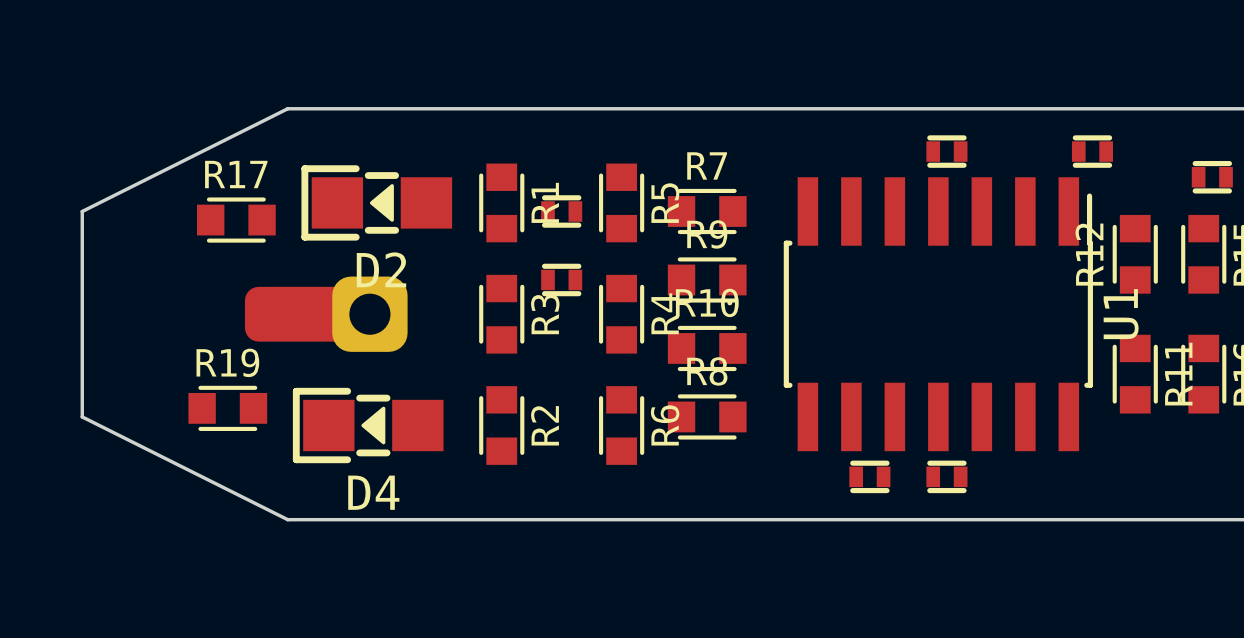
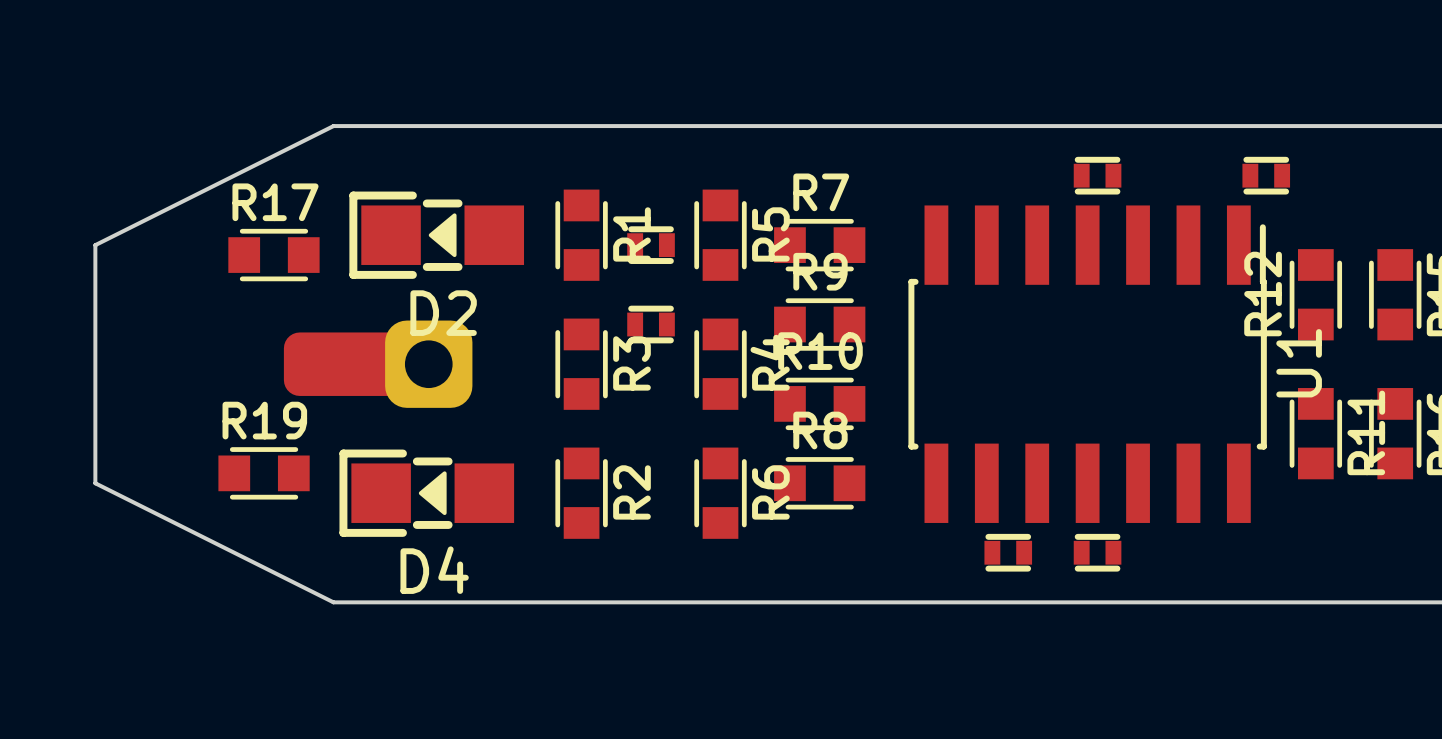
part: (1212, 177) -> none

